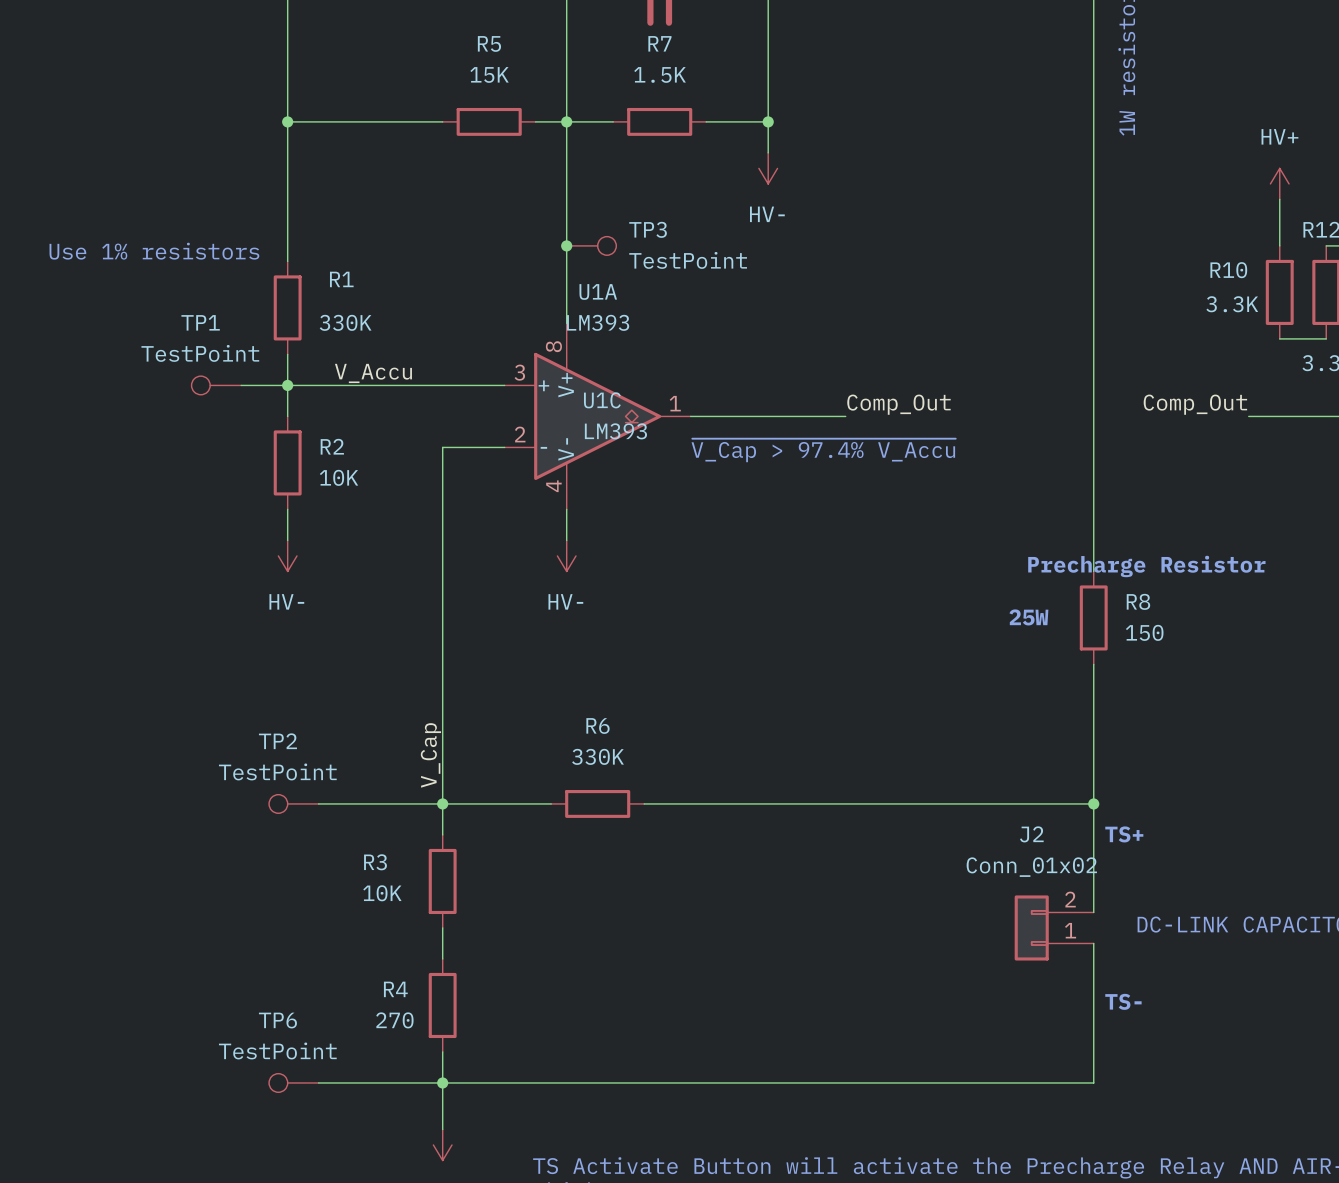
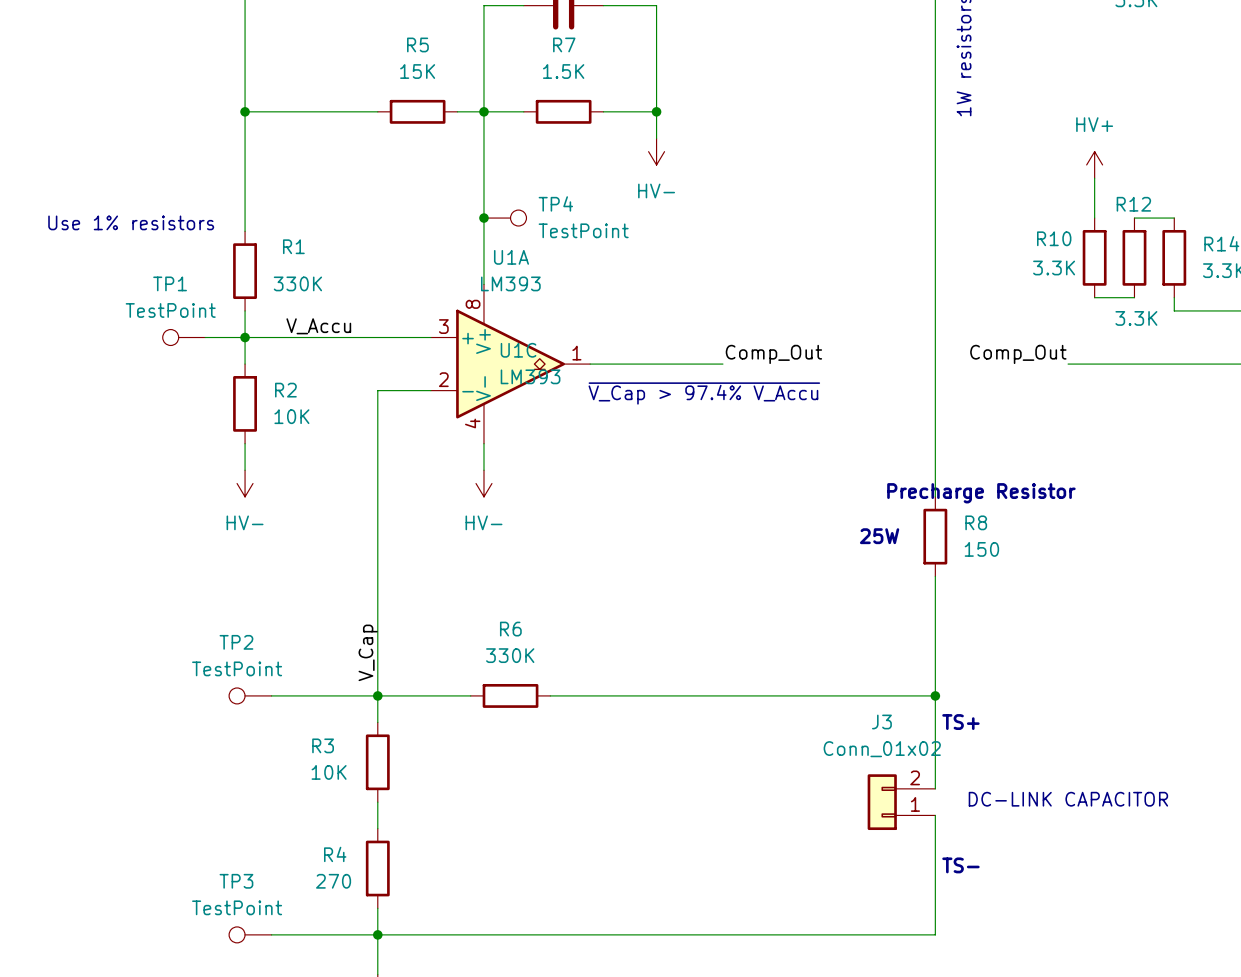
TP3 name: TP3 (648, 229) -> TP4 (555, 203)
J2 name: J2 (1031, 834) -> J3 (881, 721)
TP6 name: TP6 (277, 1020) -> TP3 (236, 881)

